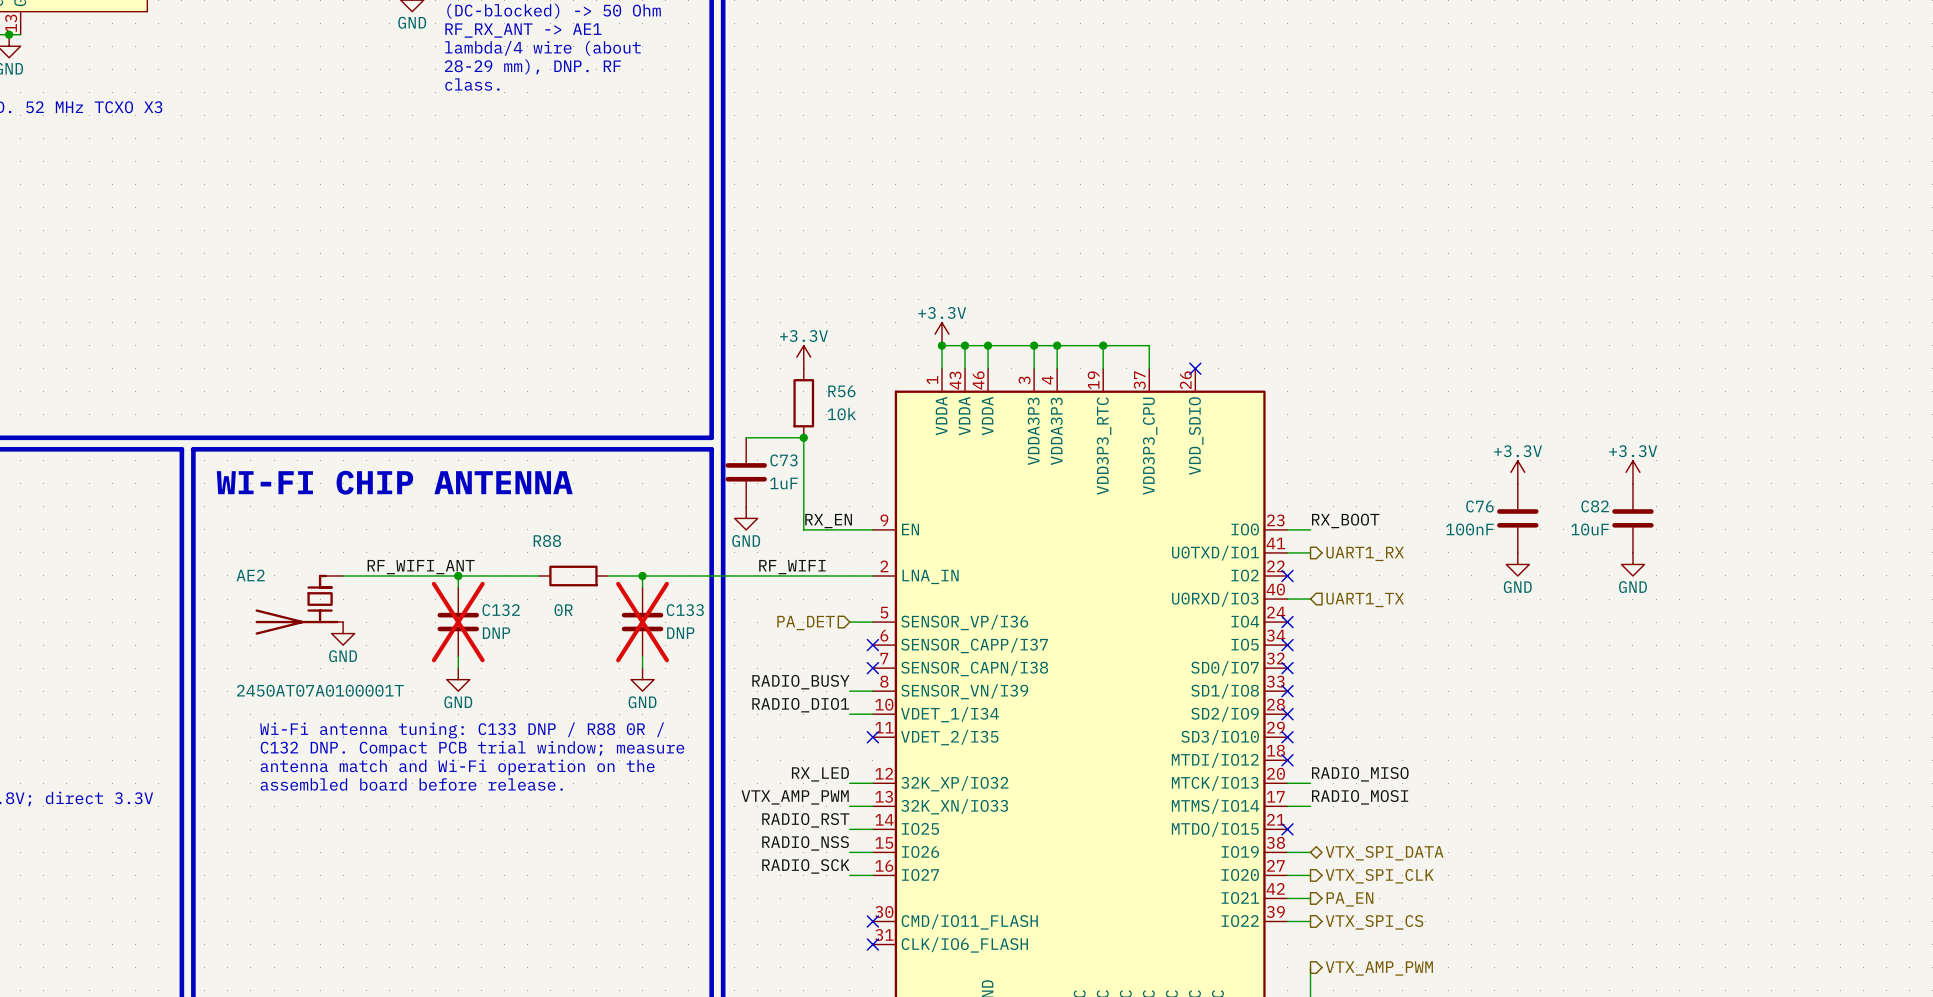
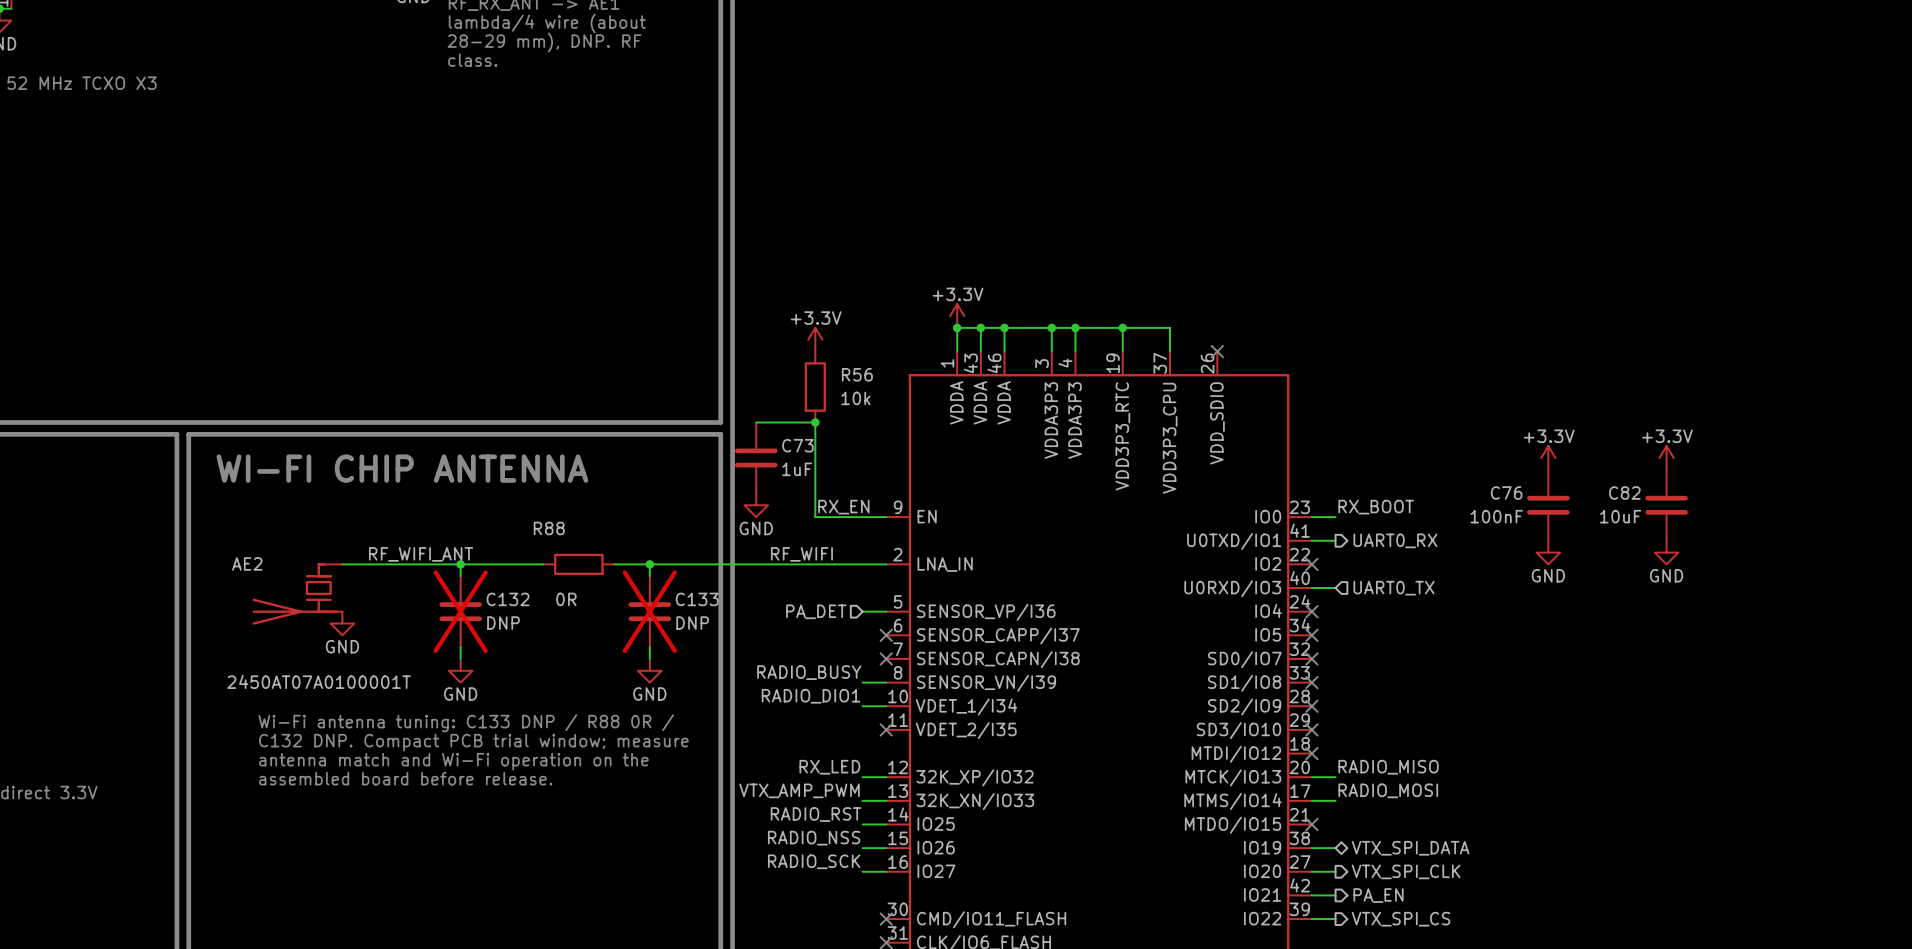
hierarchical label: UART1_RX (1365, 553) -> UART0_RX (1395, 540)
hierarchical label: UART1_TX (1365, 599) -> UART0_TX (1394, 588)

